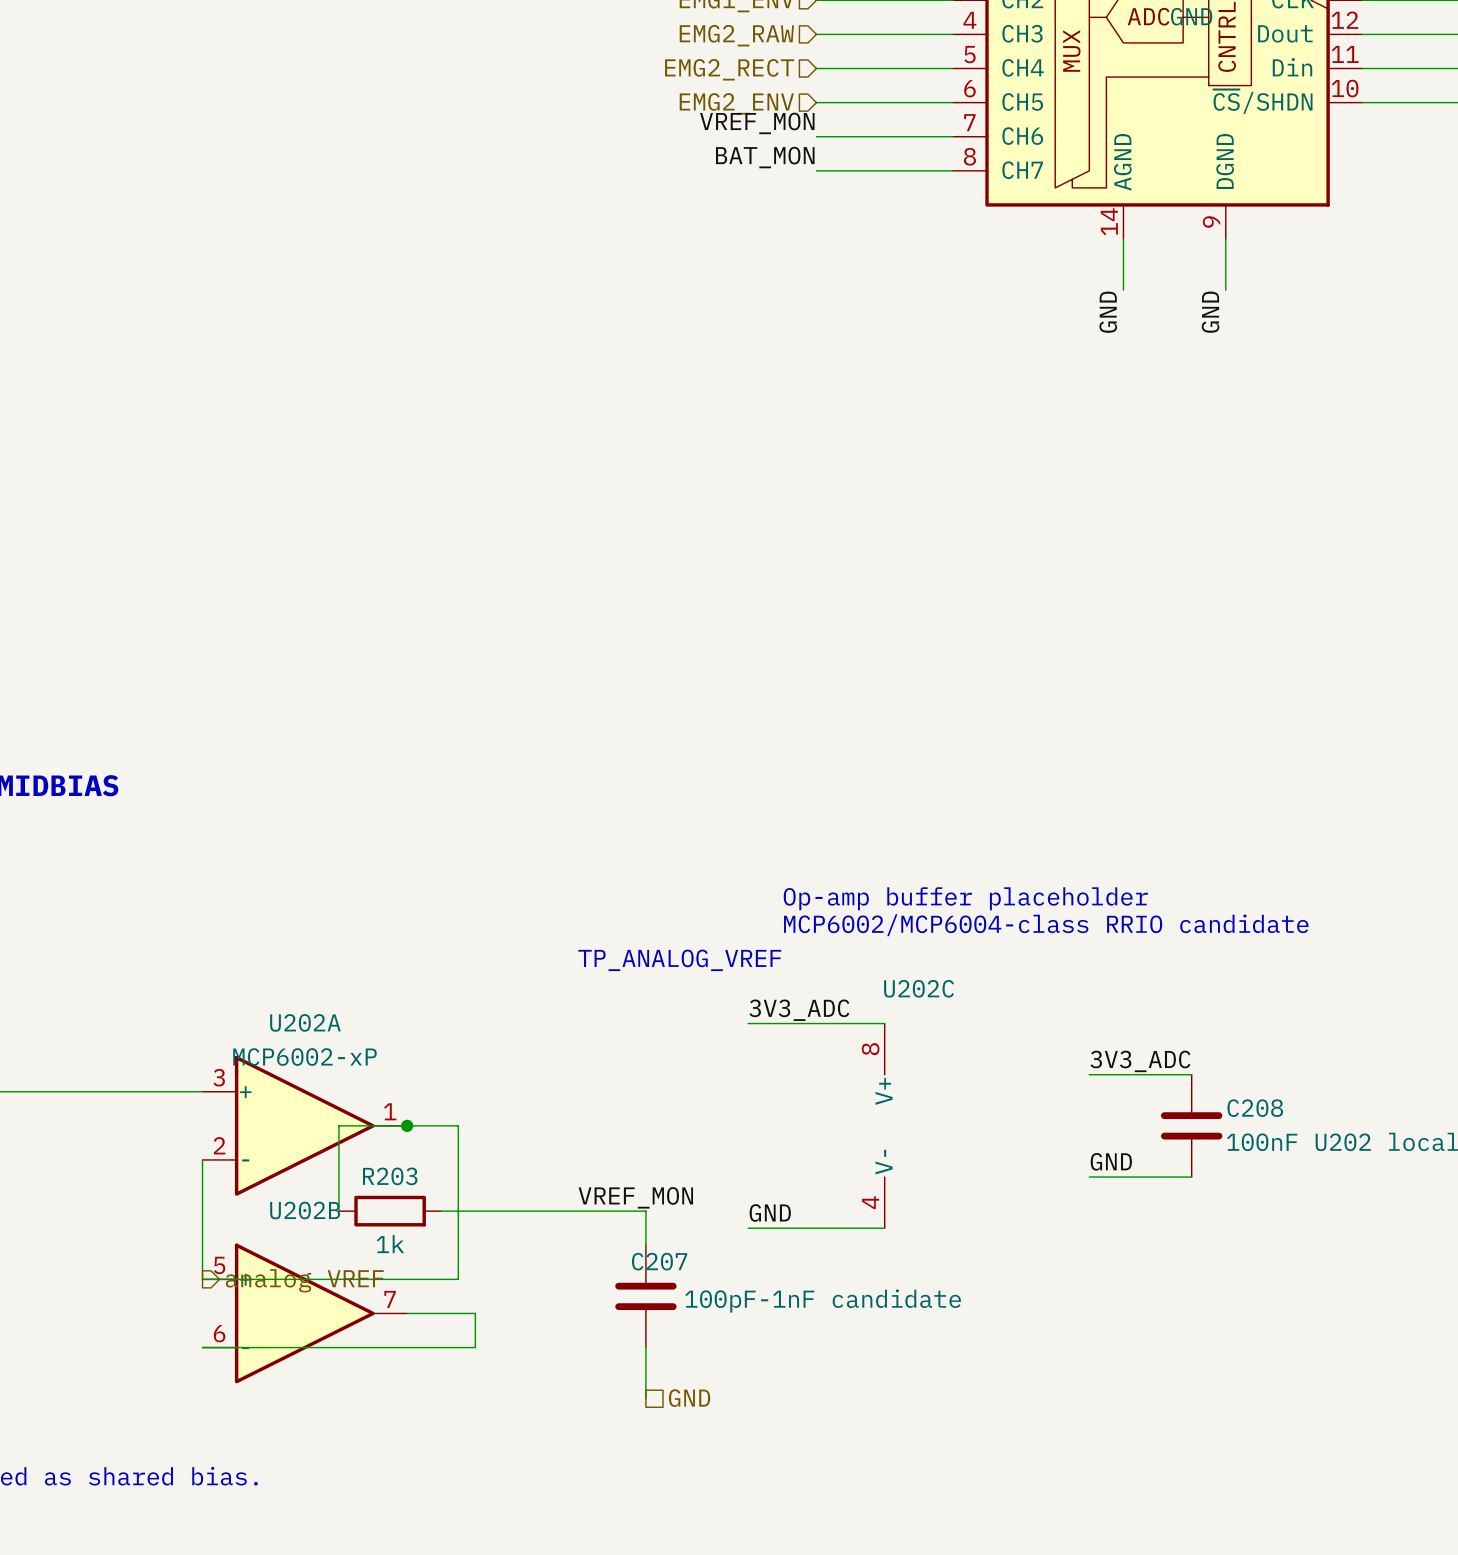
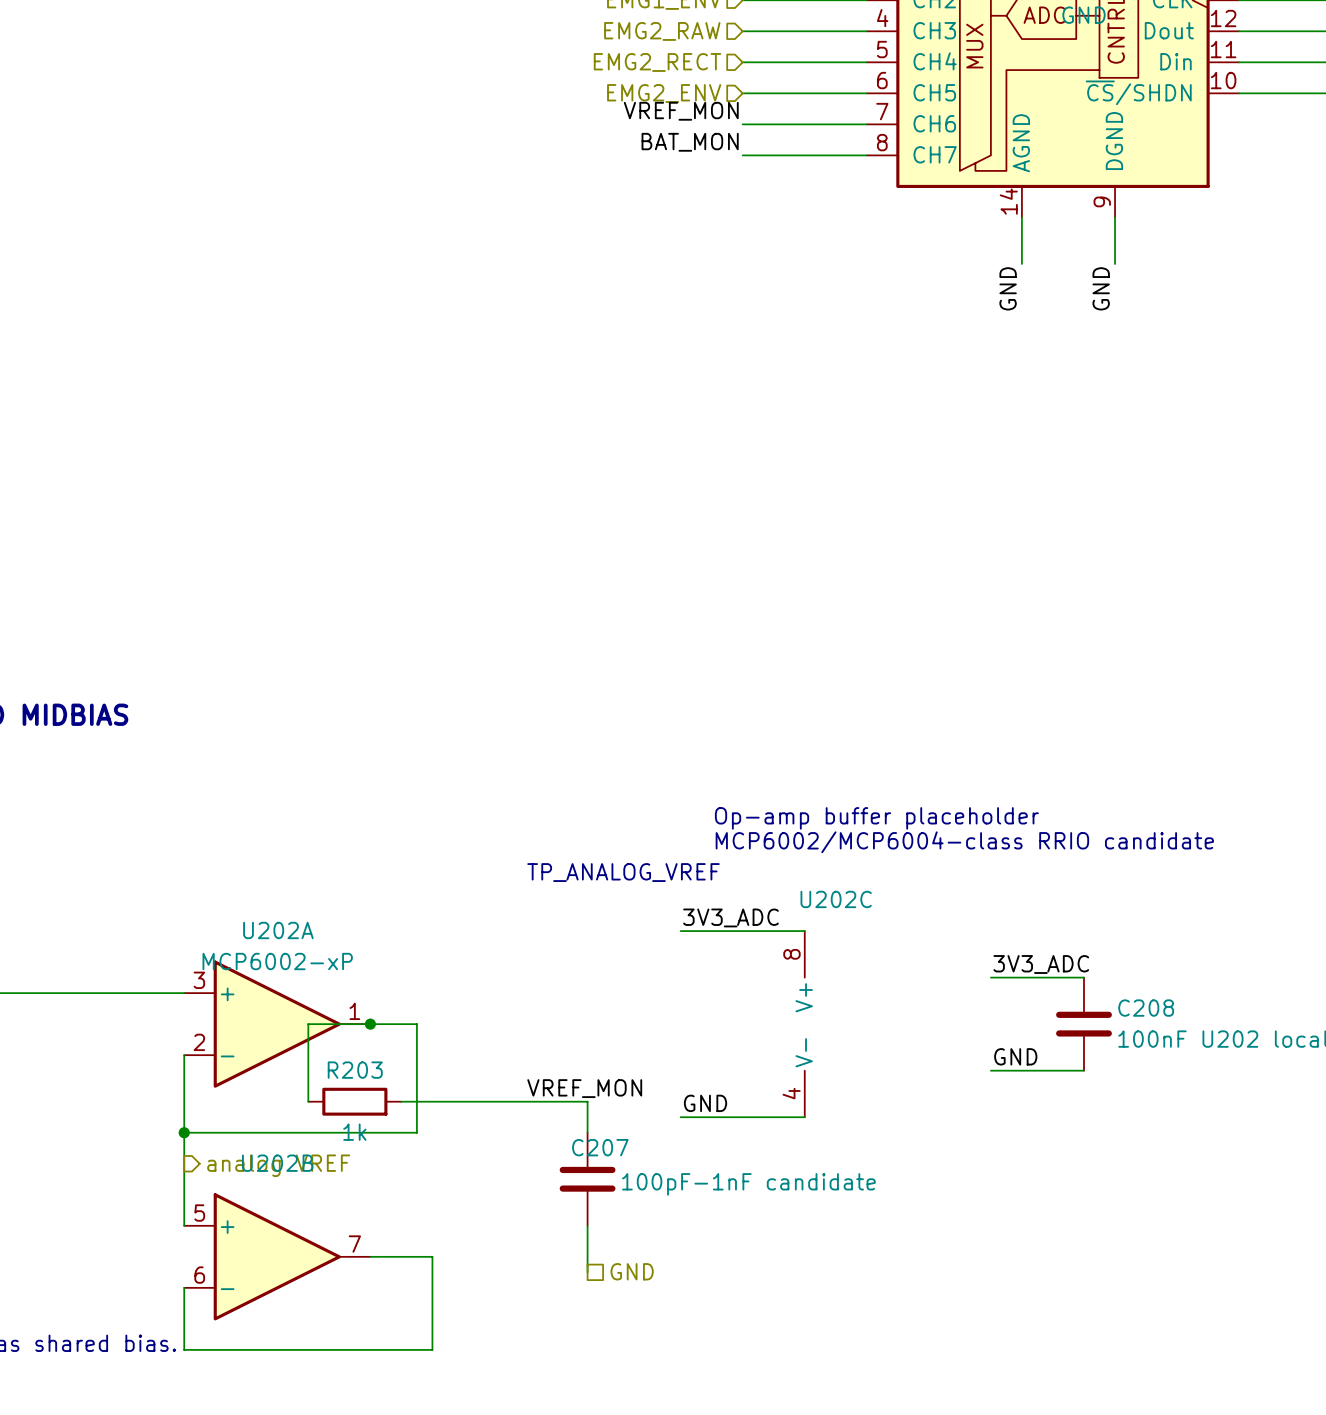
junction: none -> (184, 1132)
wire: (458, 1245) (458, 1279) (202, 1279) -> (416, 1132) (184, 1132)
U202B position: (304, 1313) -> (277, 1256)
wire: (407, 1313) (475, 1313) (475, 1347) (202, 1347) -> (184, 1163) (184, 1225)
wire: none -> (370, 1256) (432, 1256) (432, 1349) (184, 1349) (184, 1287)

